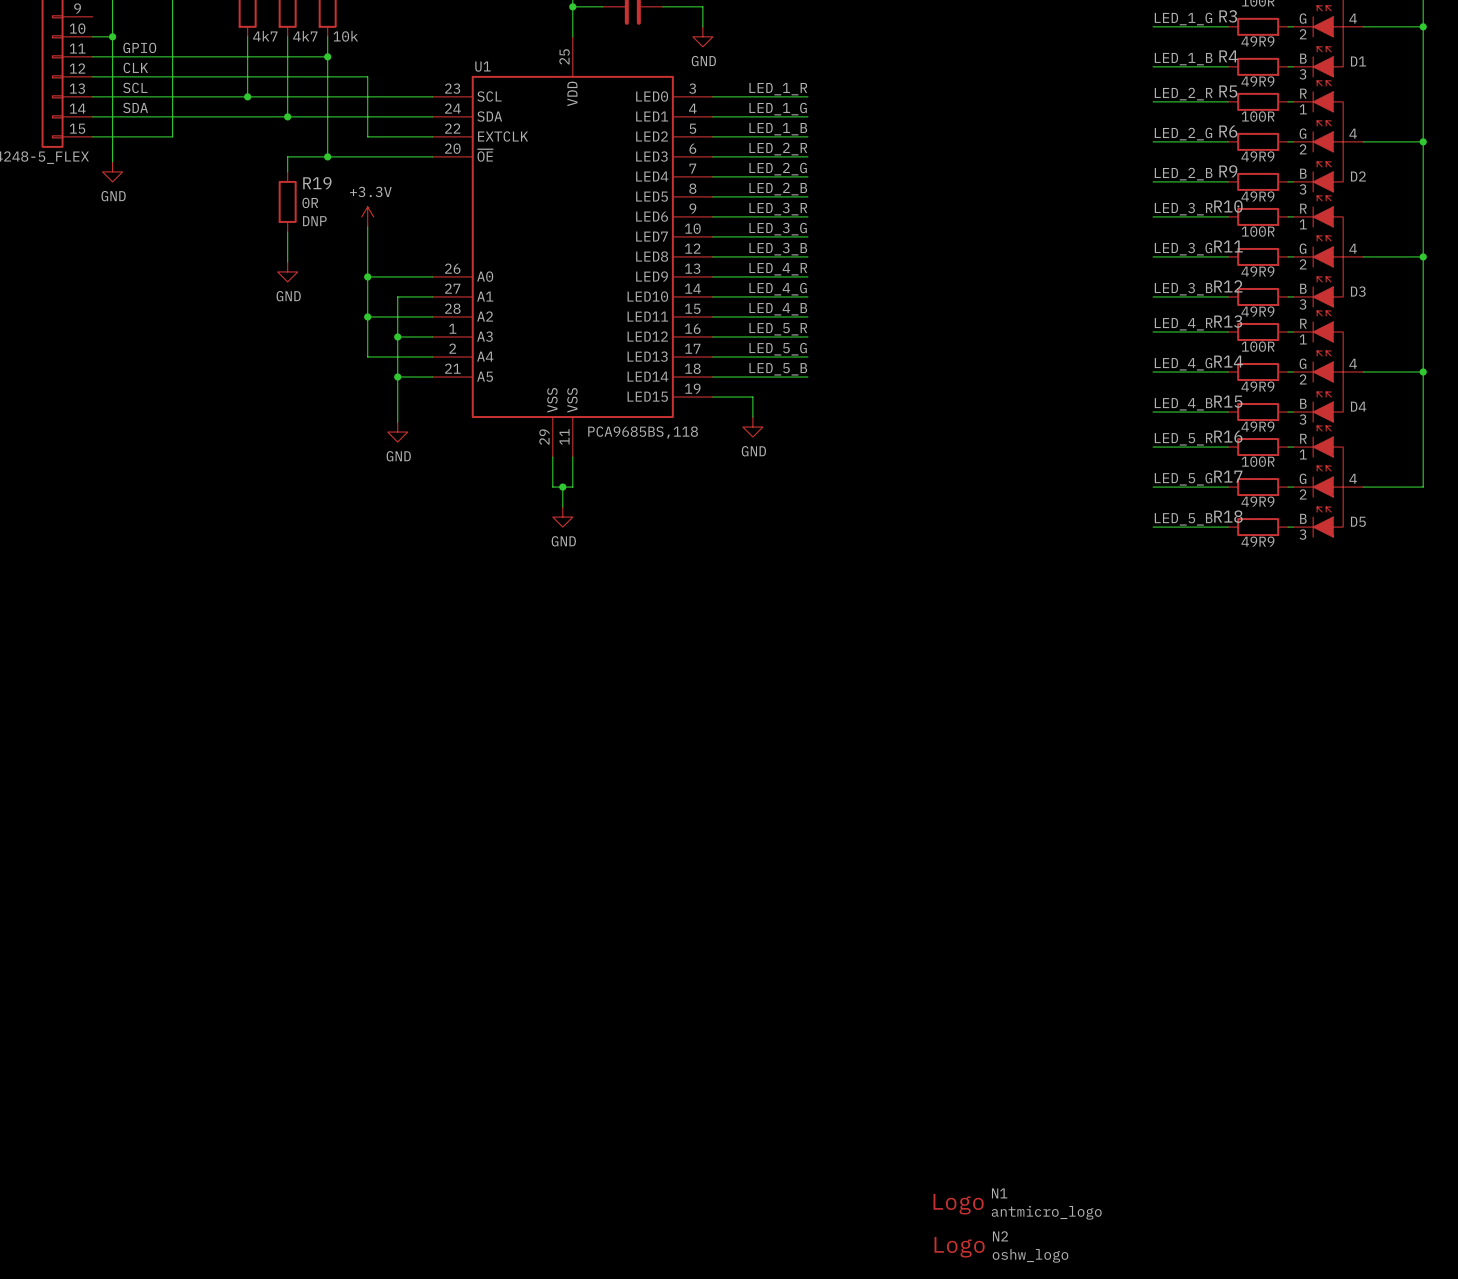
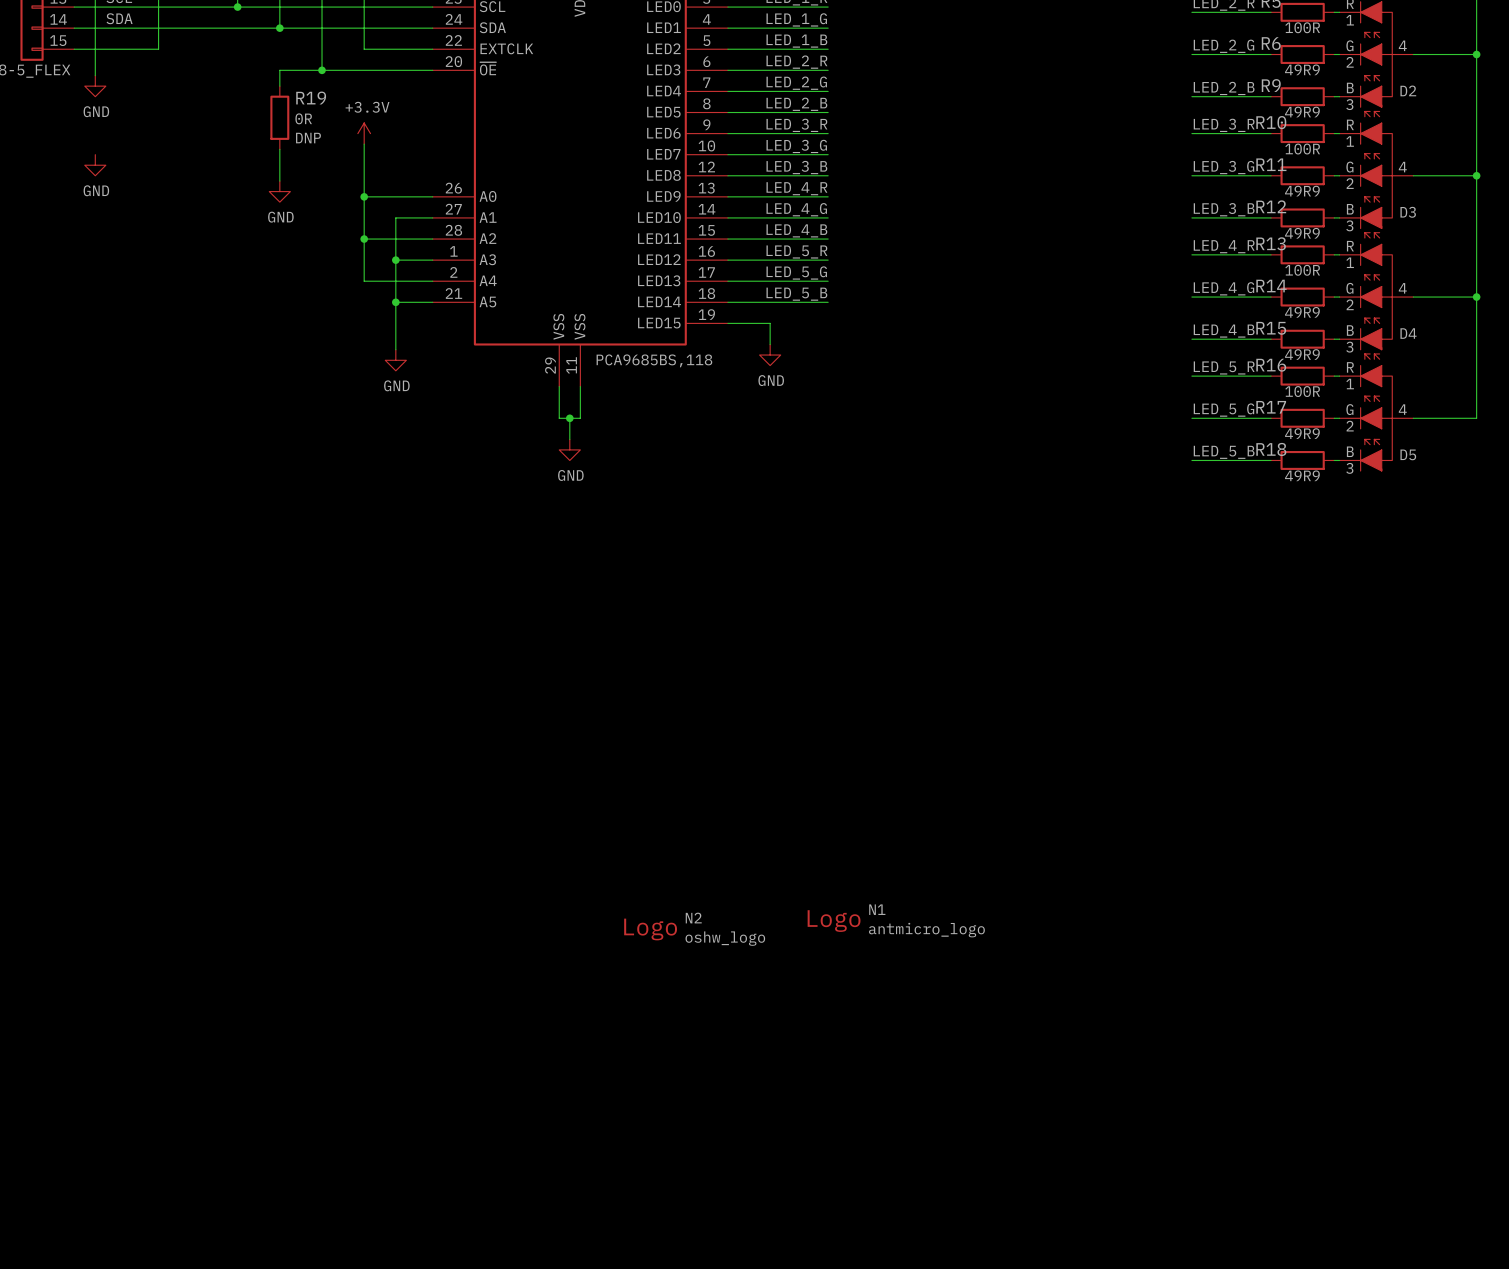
power symbol: none -> GND (95, 165)
N1 position: (1017, 1204) -> (896, 920)
N2 position: (1001, 1246) -> (694, 929)

